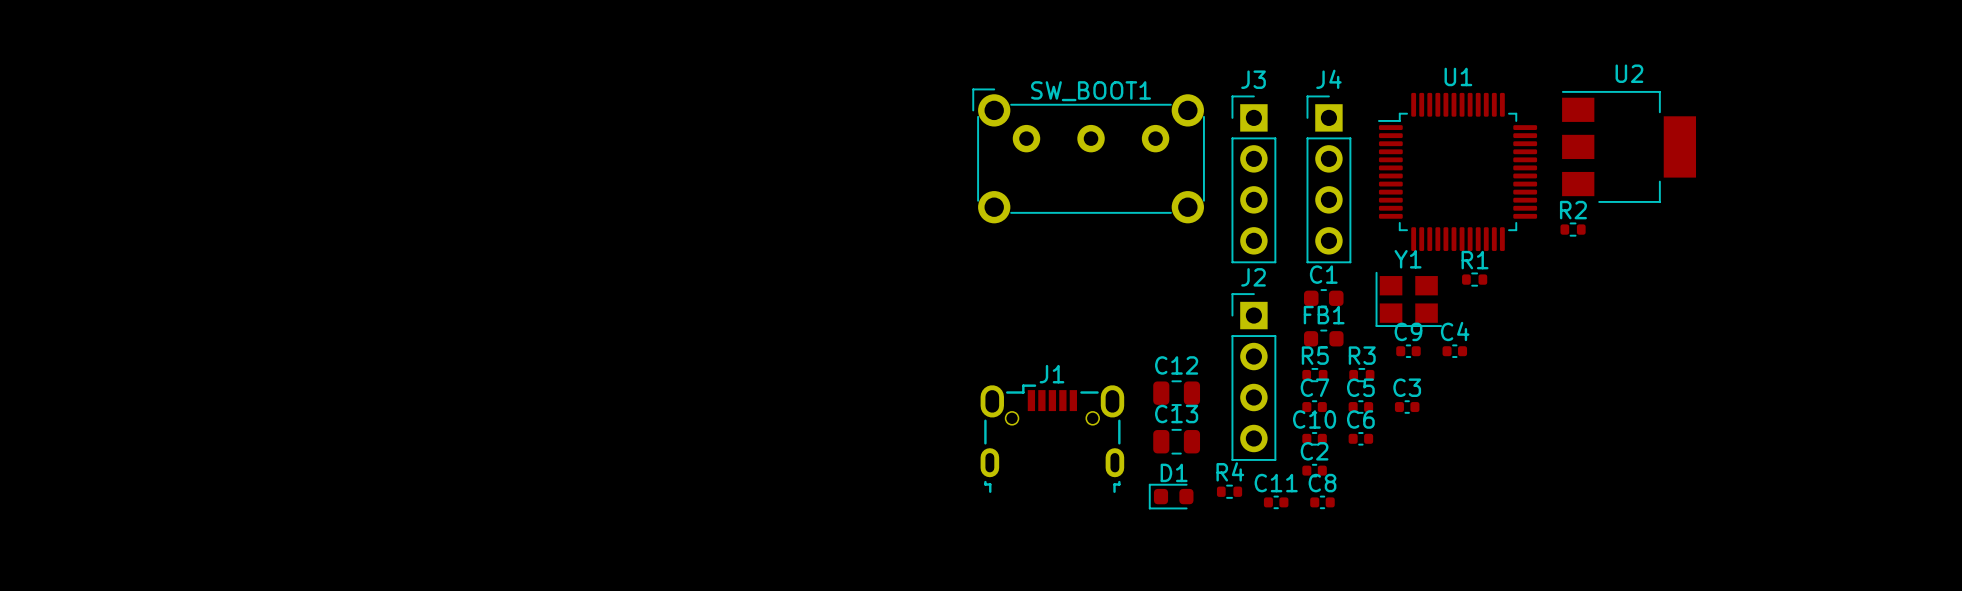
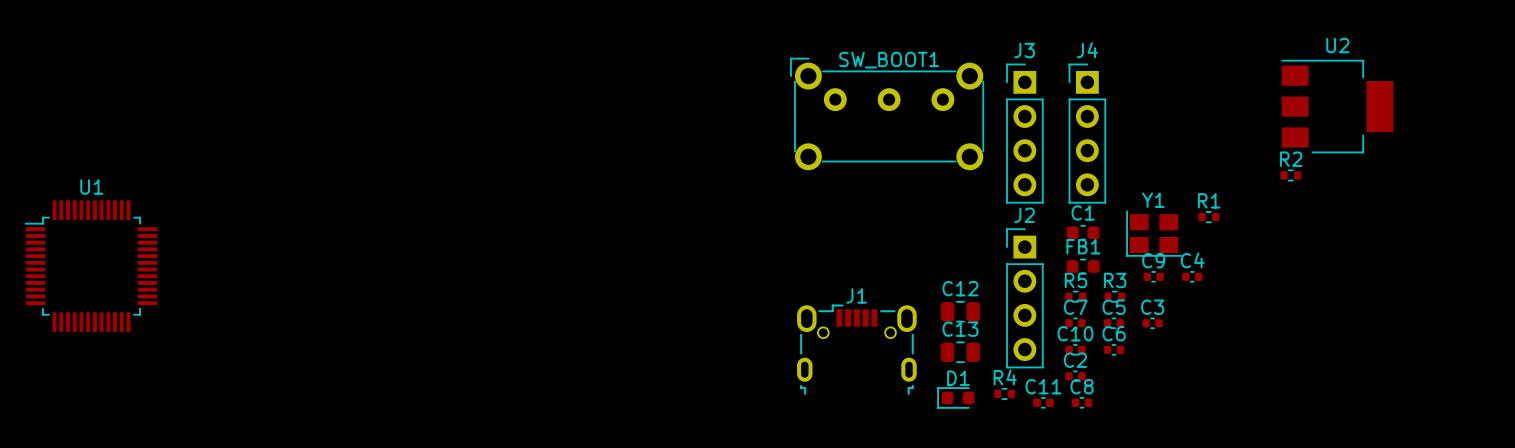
U1 position: (1457, 171) -> (91, 266)

